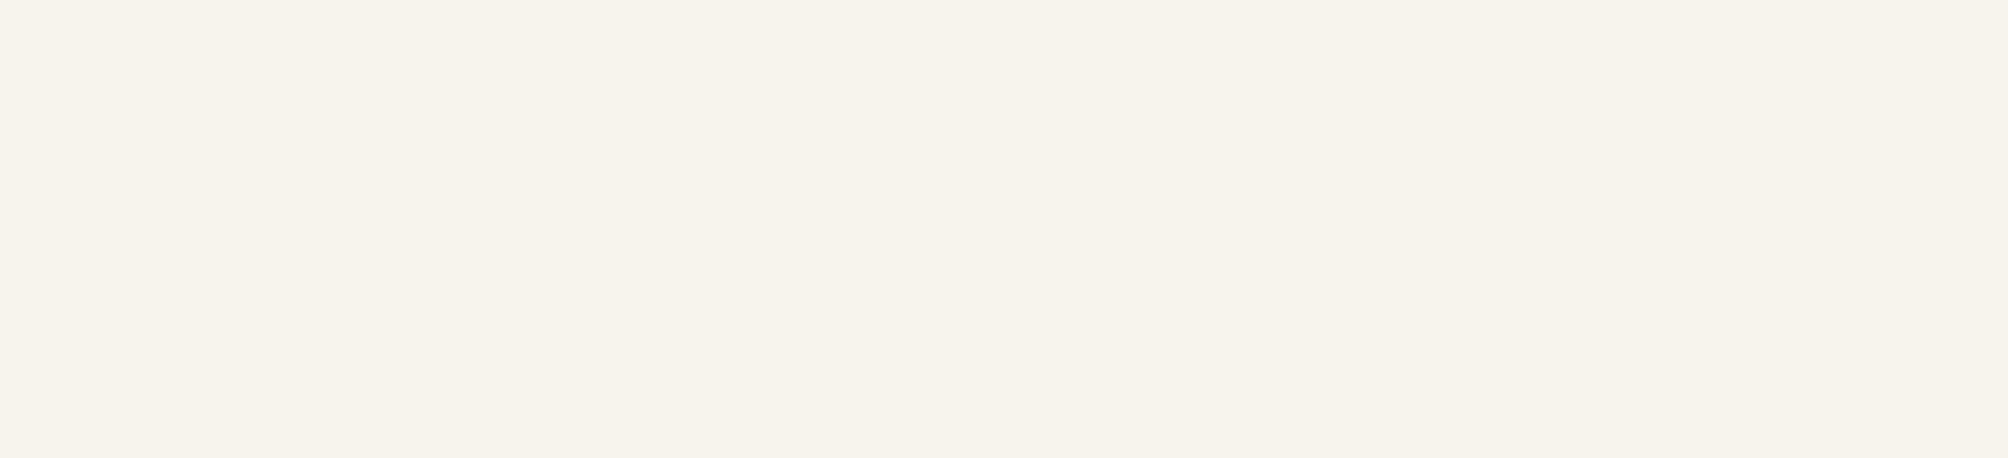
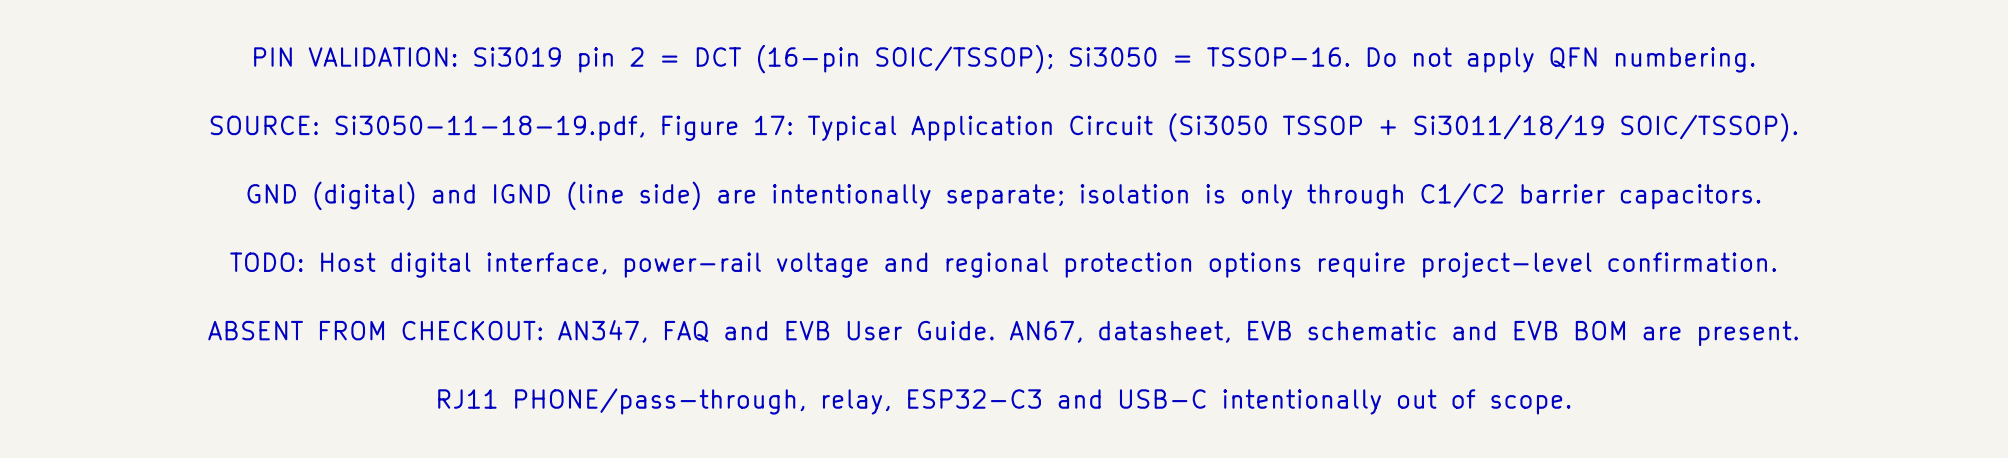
text: none -> PIN VALIDATION: Si3019 pin 2 = DCT (16-pin SOIC/TSSOP); Si3050 = TSSOP-16. Do not apply QFN numbering. (1004, 59)
text: none -> SOURCE: Si3050-11-18-19.pdf, Figure 17: Typical Application Circuit (Si3050 TSSOP + Si3011/18/19 SOIC/TSSOP). (1003, 127)
text: none -> GND (digital) and IGND (line side) are intentionally separate; isolation is only through C1/C2 barrier capacitors. (1003, 195)
text: none -> TODO: Host digital interface, power-rail voltage and regional protection options require project-level confirmation. (1003, 265)
text: none -> ABSENT FROM CHECKOUT: AN347, FAQ and EVB User Guide. AN67, datasheet, EVB schematic and EVB BOM are present. (1003, 333)
text: none -> RJ11 PHONE/pass-through, relay, ESP32-C3 and USB-C intentionally out of scope. (1004, 401)

